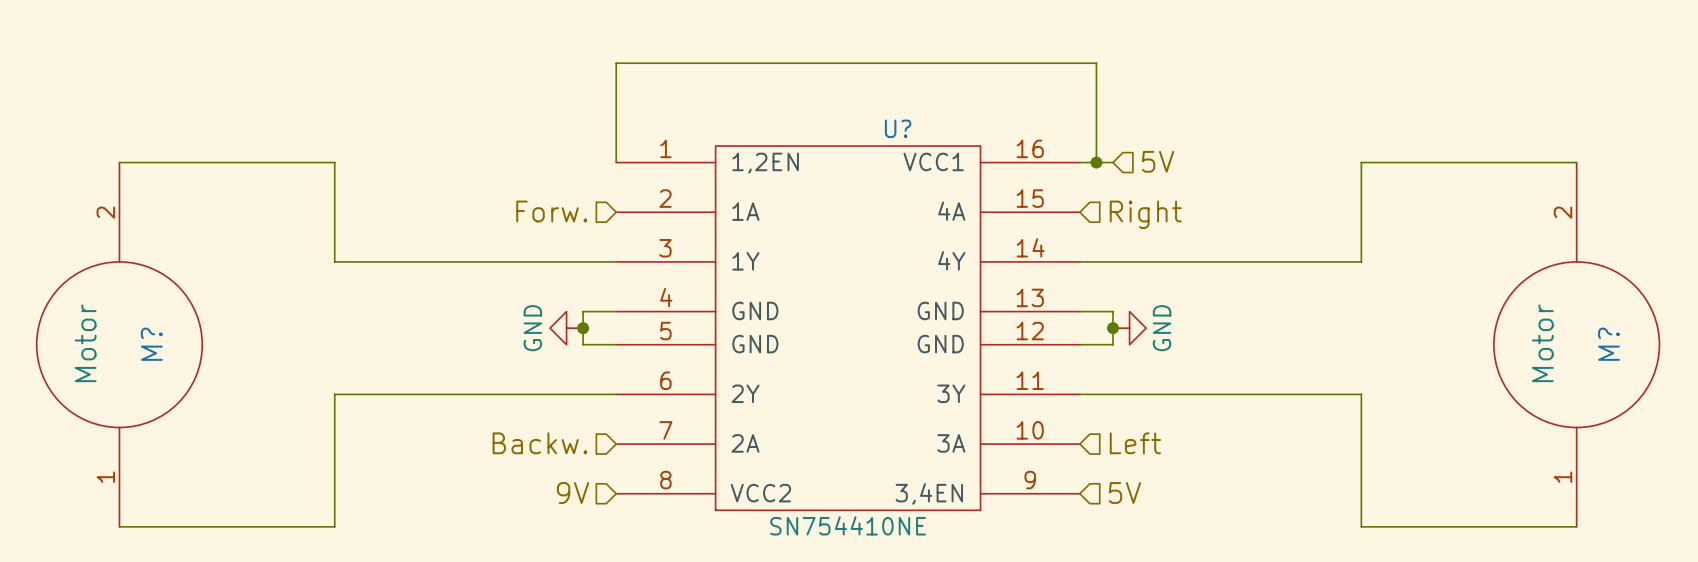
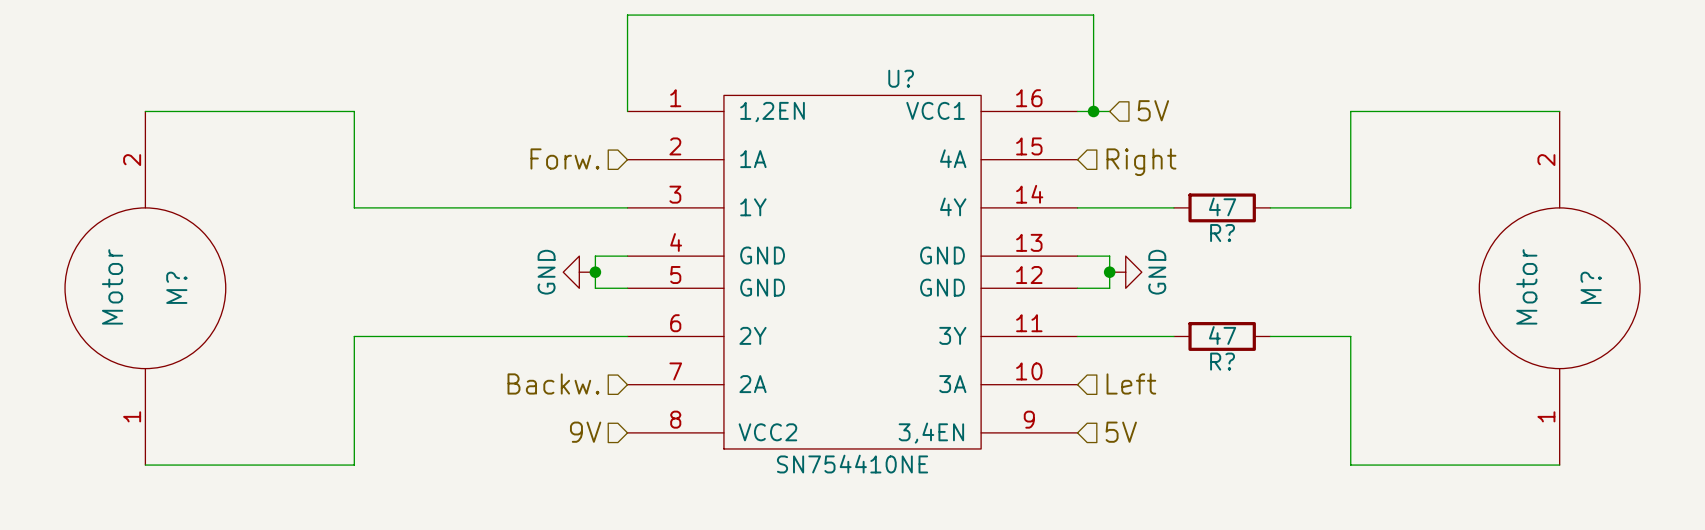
wire: (1179, 261) (1278, 261) -> none
R?: none -> 47 (1222, 207)
wire: (1179, 394) (1278, 394) -> none
R?: none -> 47 (1222, 336)

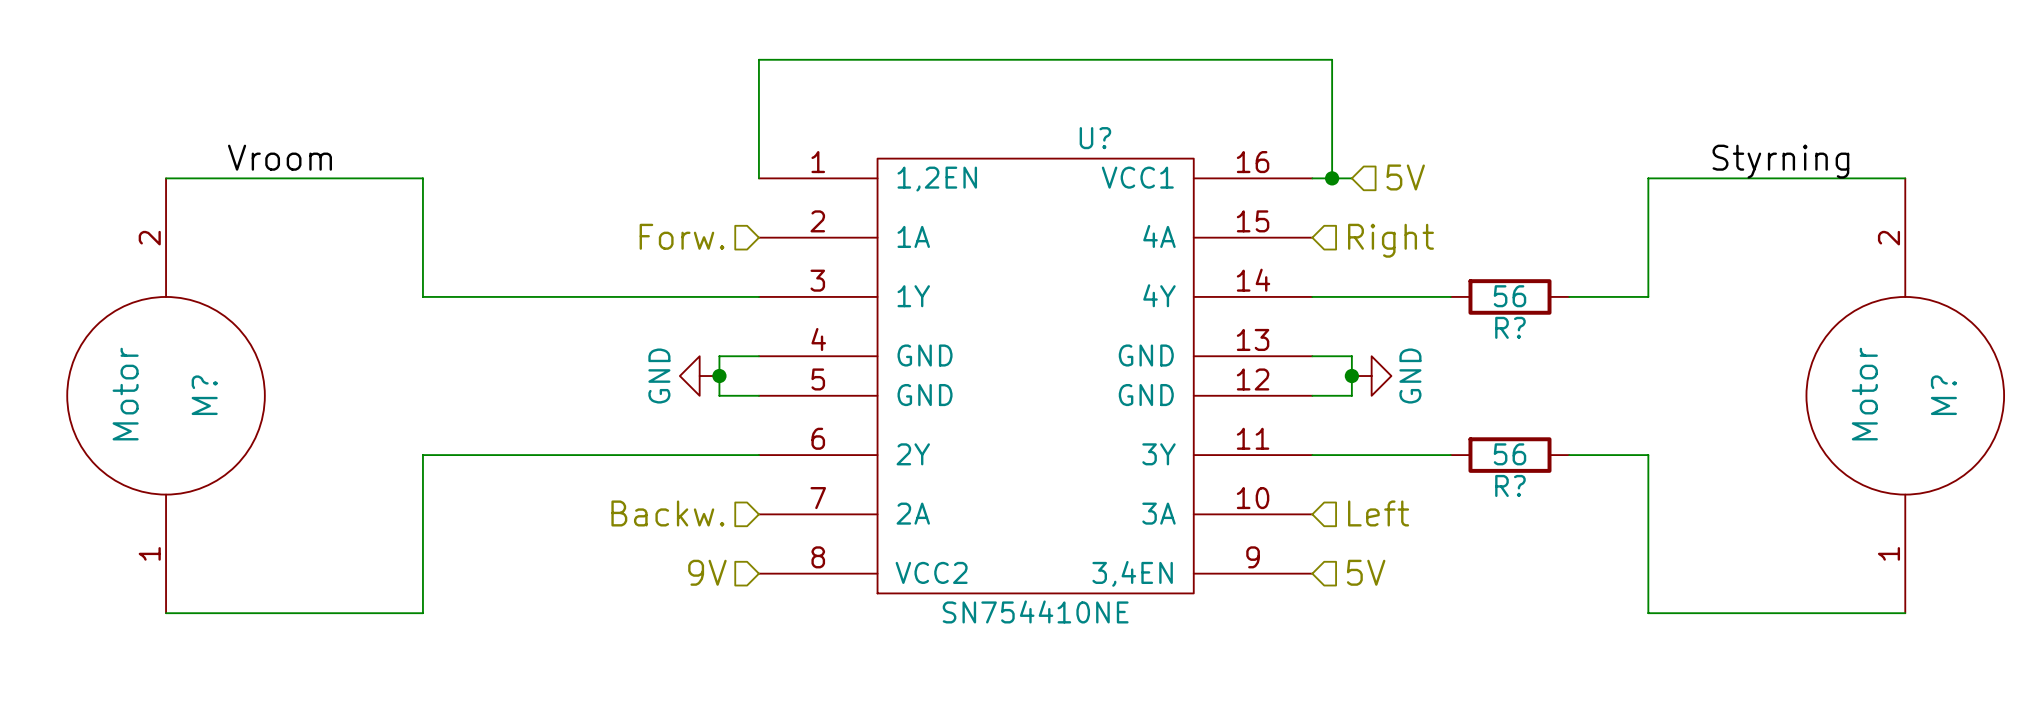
label: none -> Vroom (279, 157)
label: none -> Styrning (1780, 161)
R?: 47 (1222, 207) -> none
R?: none -> 56 (1509, 296)
R?: 47 (1222, 336) -> none
R?: none -> 56 (1509, 455)

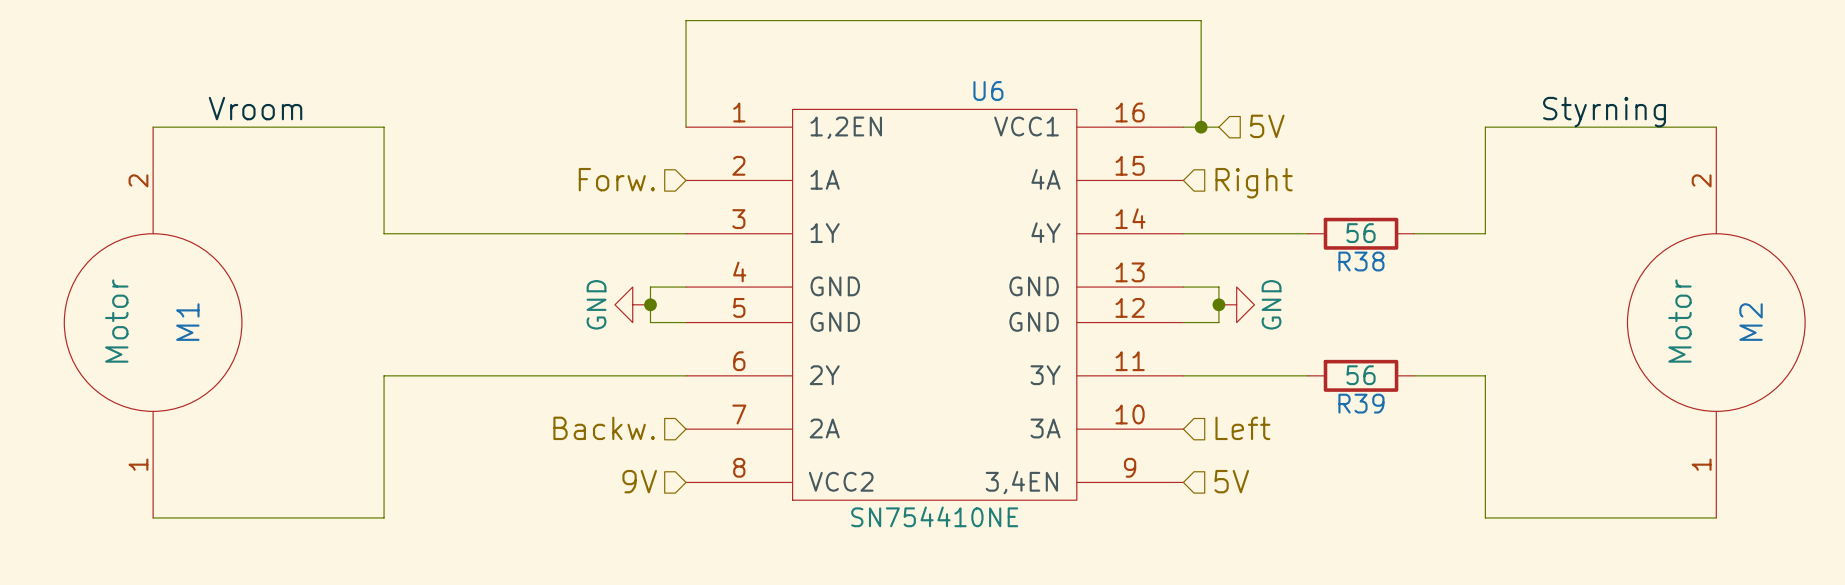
U? name: U? (1095, 138) -> U6 (988, 90)
R? name: R? (1510, 327) -> R38 (1361, 261)
M? name: M? (204, 395) -> M1 (187, 322)
M? name: M? (1943, 395) -> M2 (1751, 322)
R? name: R? (1510, 485) -> R39 (1361, 403)

